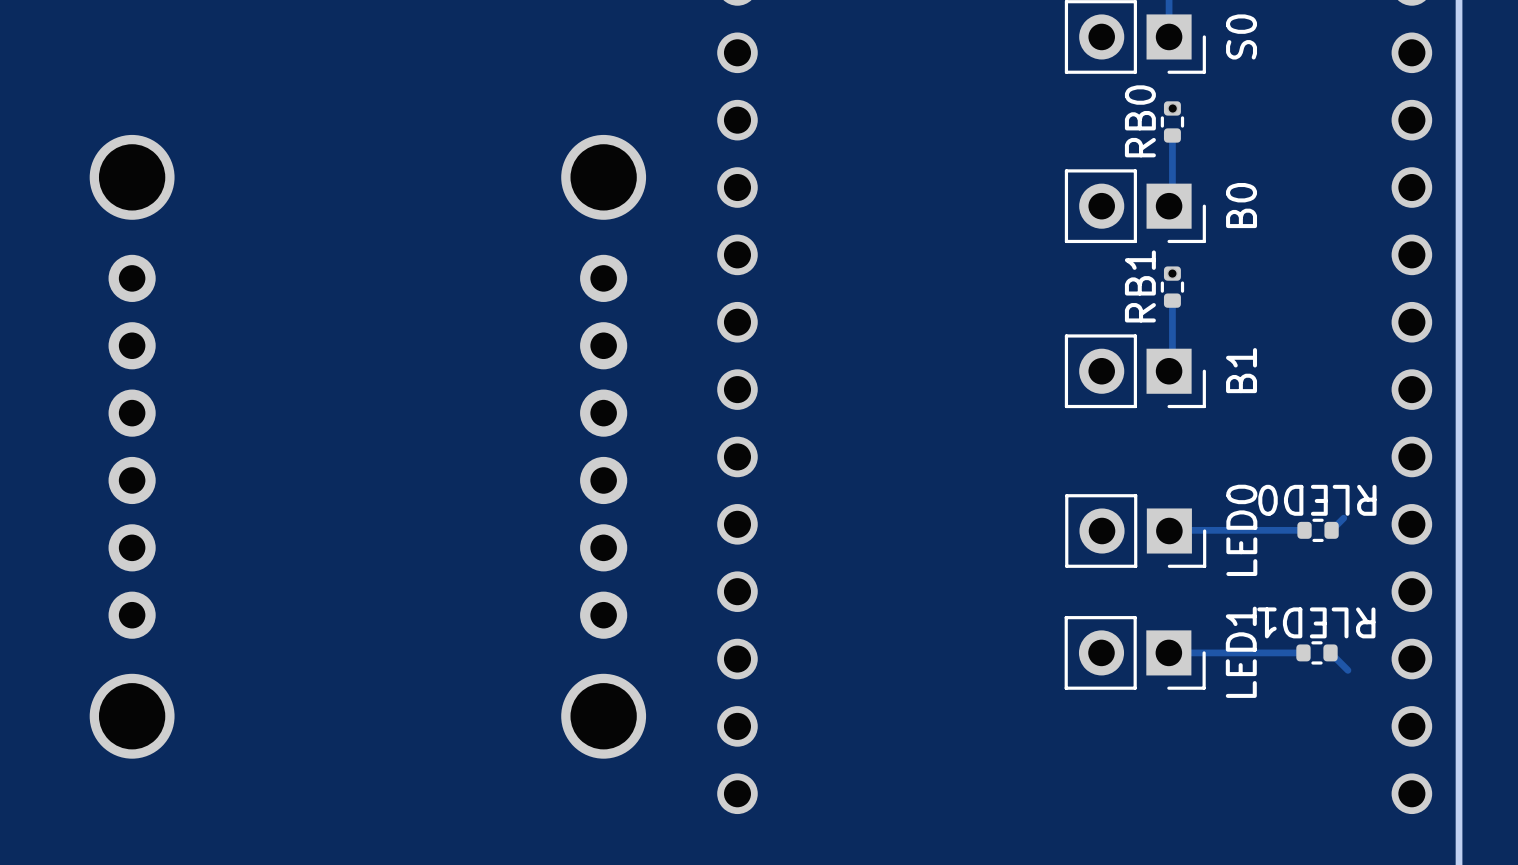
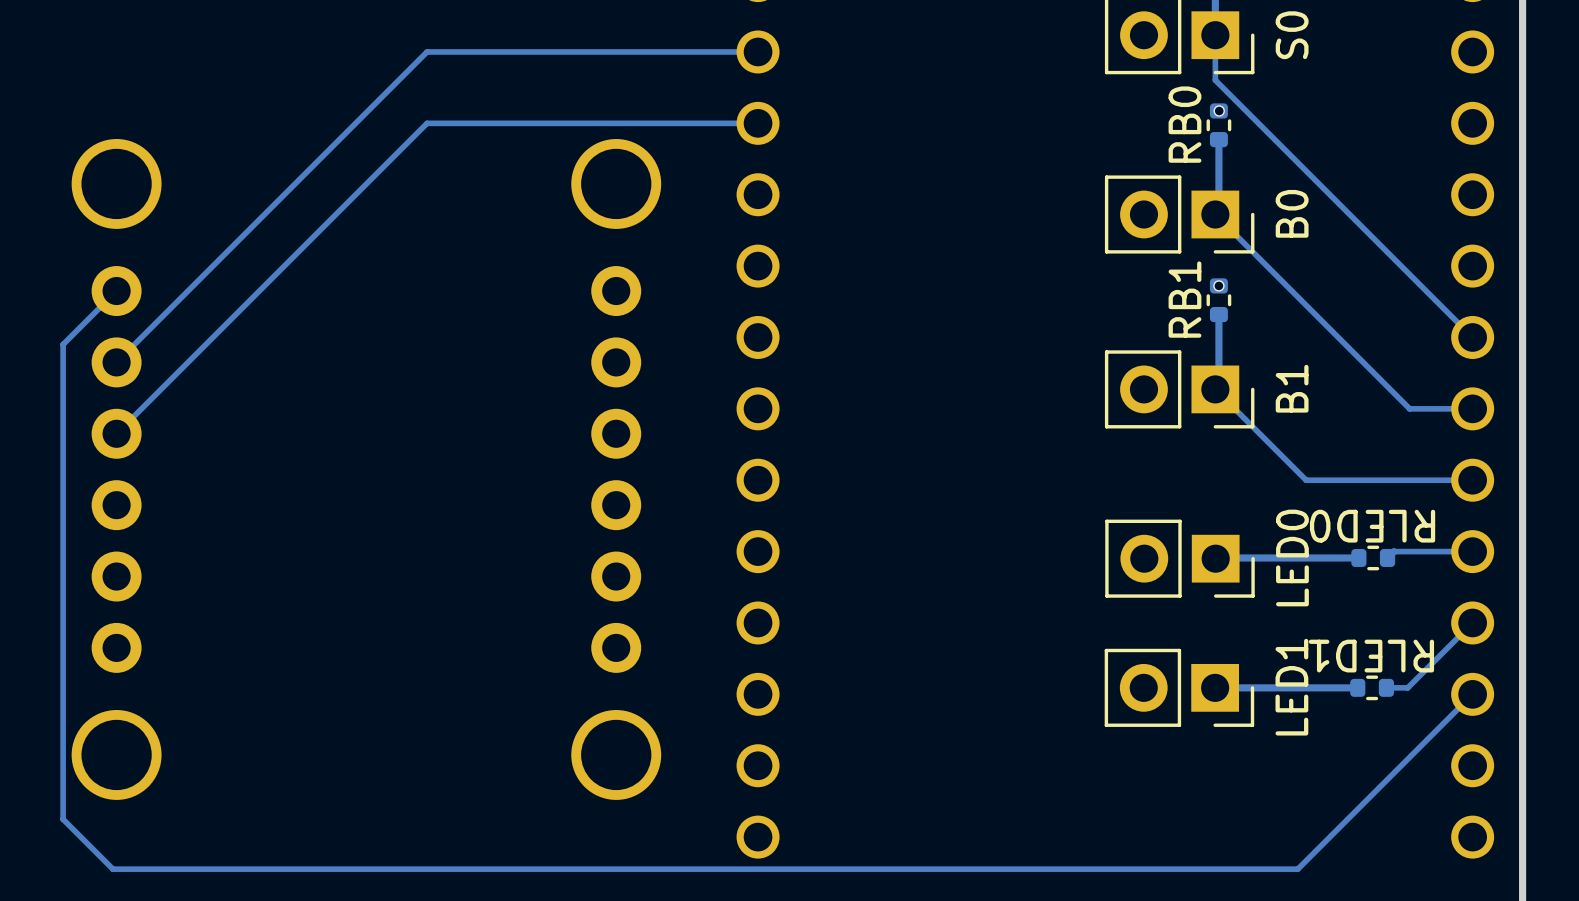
track: none -> (1215, 35) (1215, 80) (1472, 337)
track: none -> (758, 51) (427, 51) (116, 362)
track: none -> (758, 123) (427, 123) (116, 433)
track: none -> (1215, 214) (1409, 408) (1472, 408)
track: none -> (116, 291) (63, 344) (63, 819) (112, 869) (1297, 869) (1472, 694)
track: none -> (1215, 389) (1306, 480) (1472, 480)
track: (1343, 518) (1337, 524) -> (1472, 551) (1393, 551)
track: (1330, 652) (1347, 670) -> (1386, 687) (1407, 687) (1472, 622)

